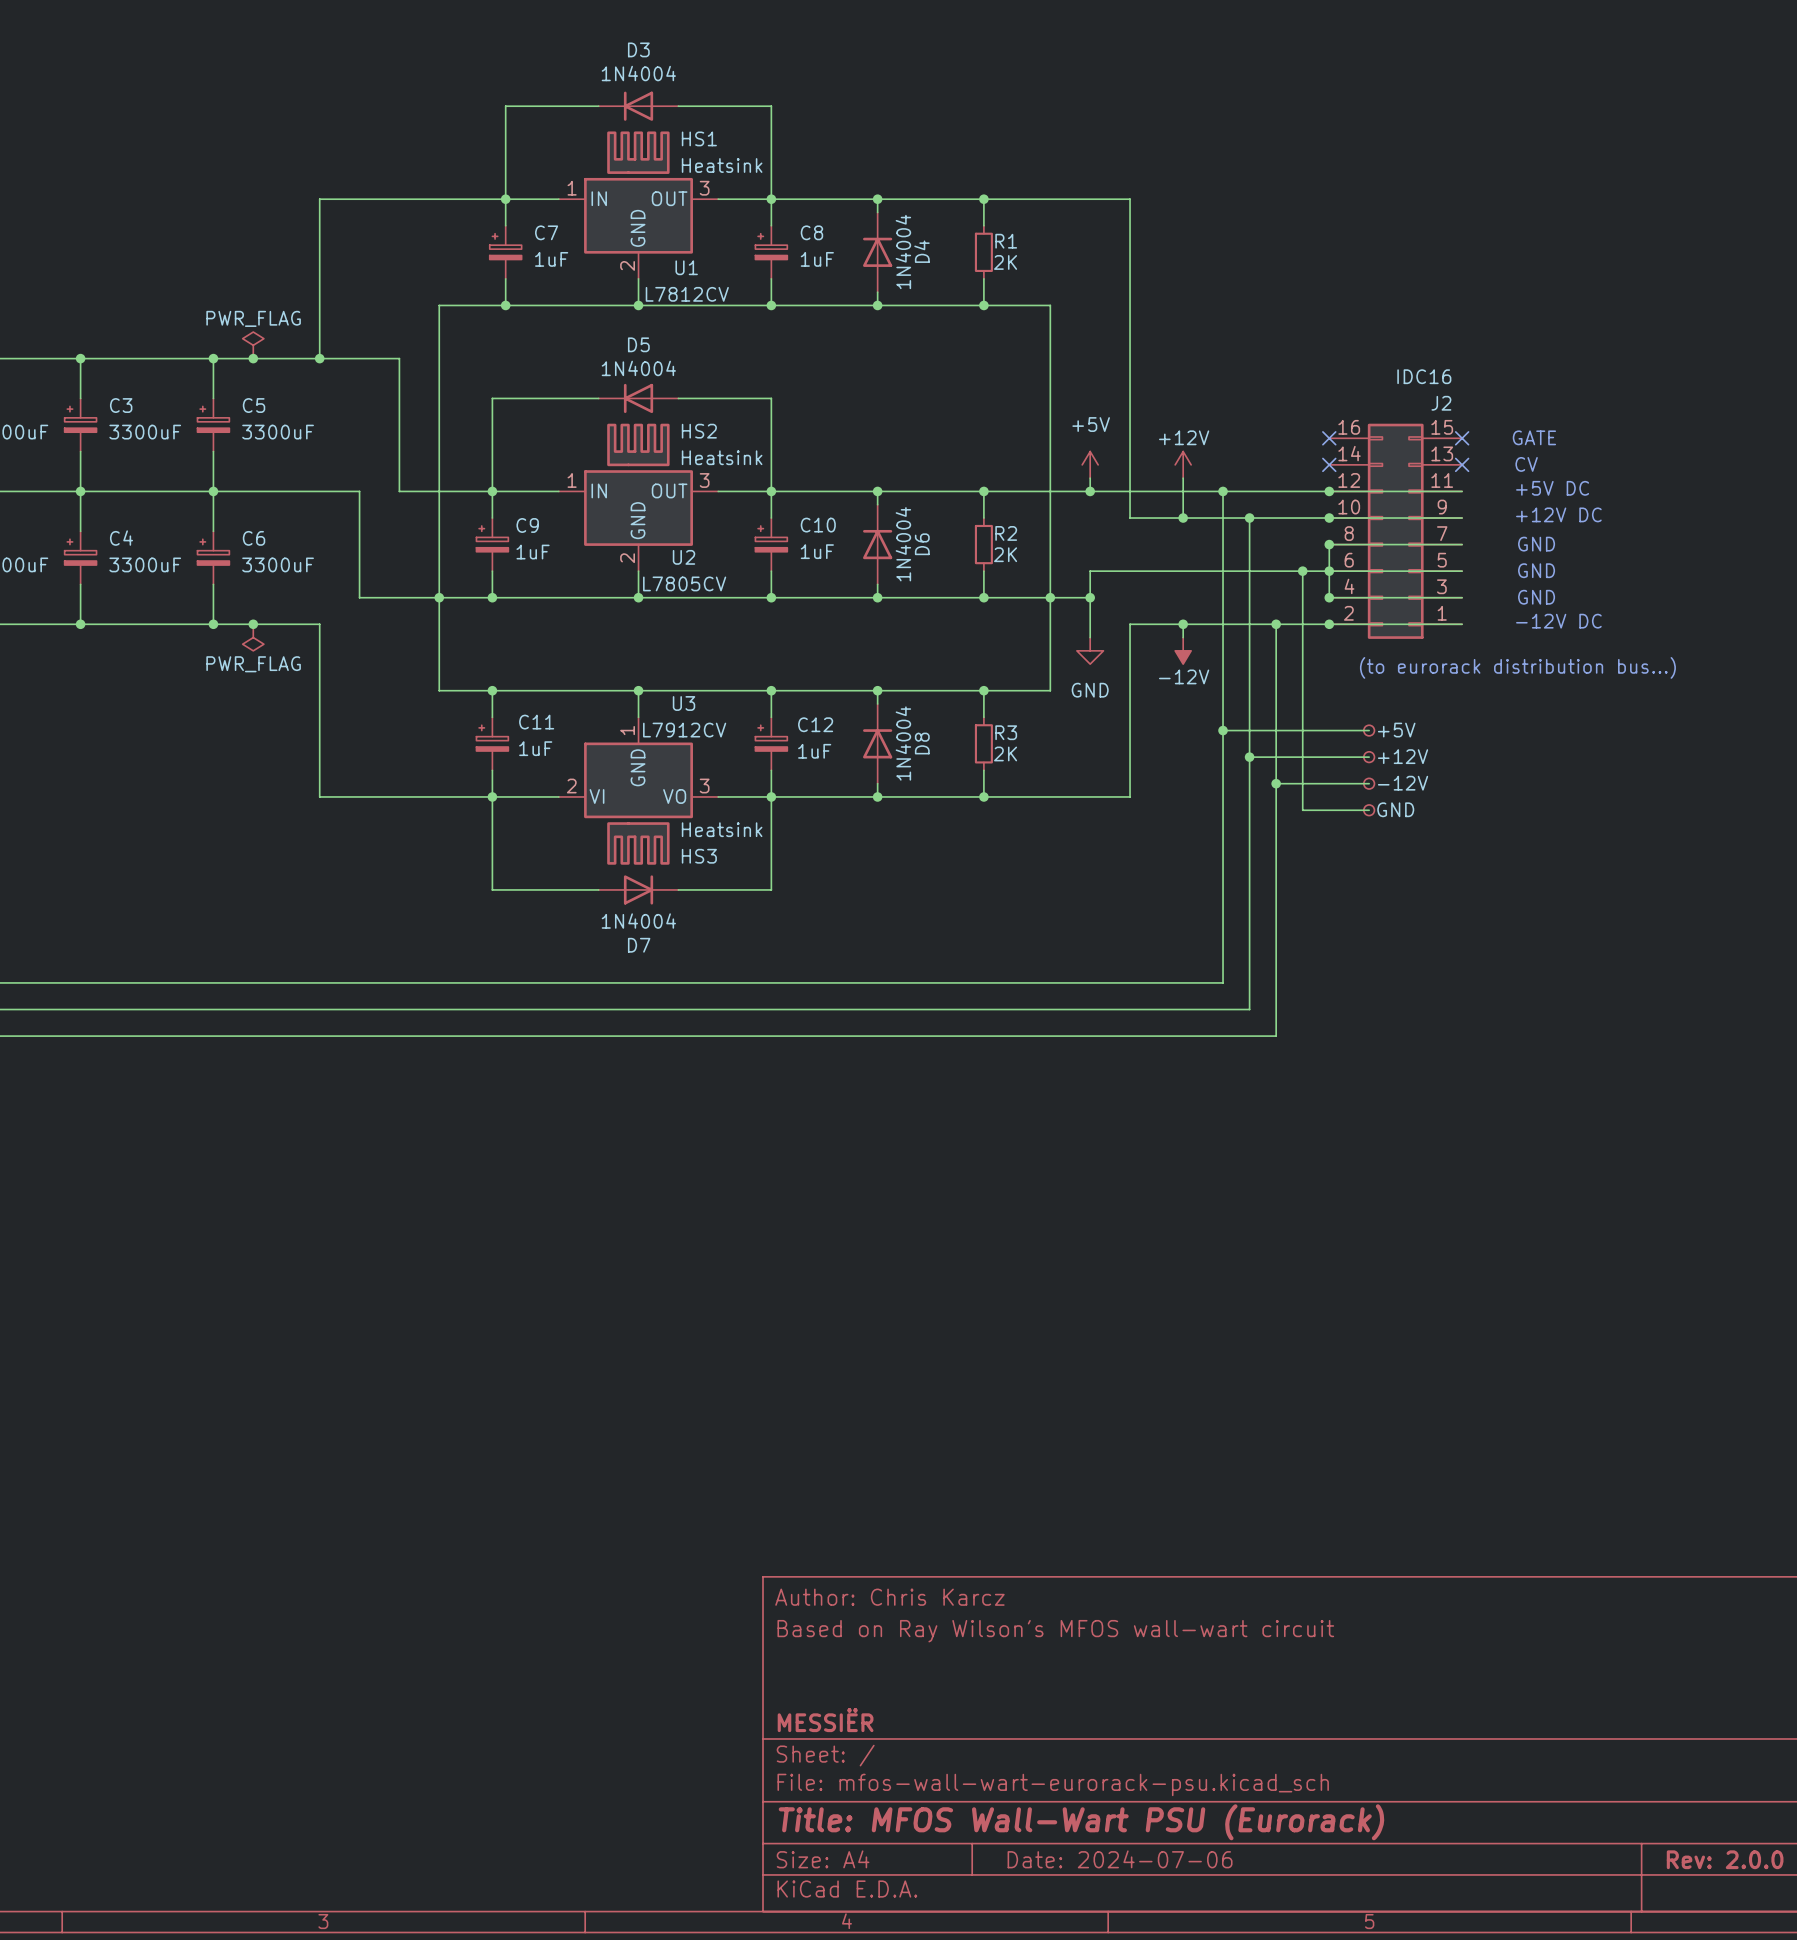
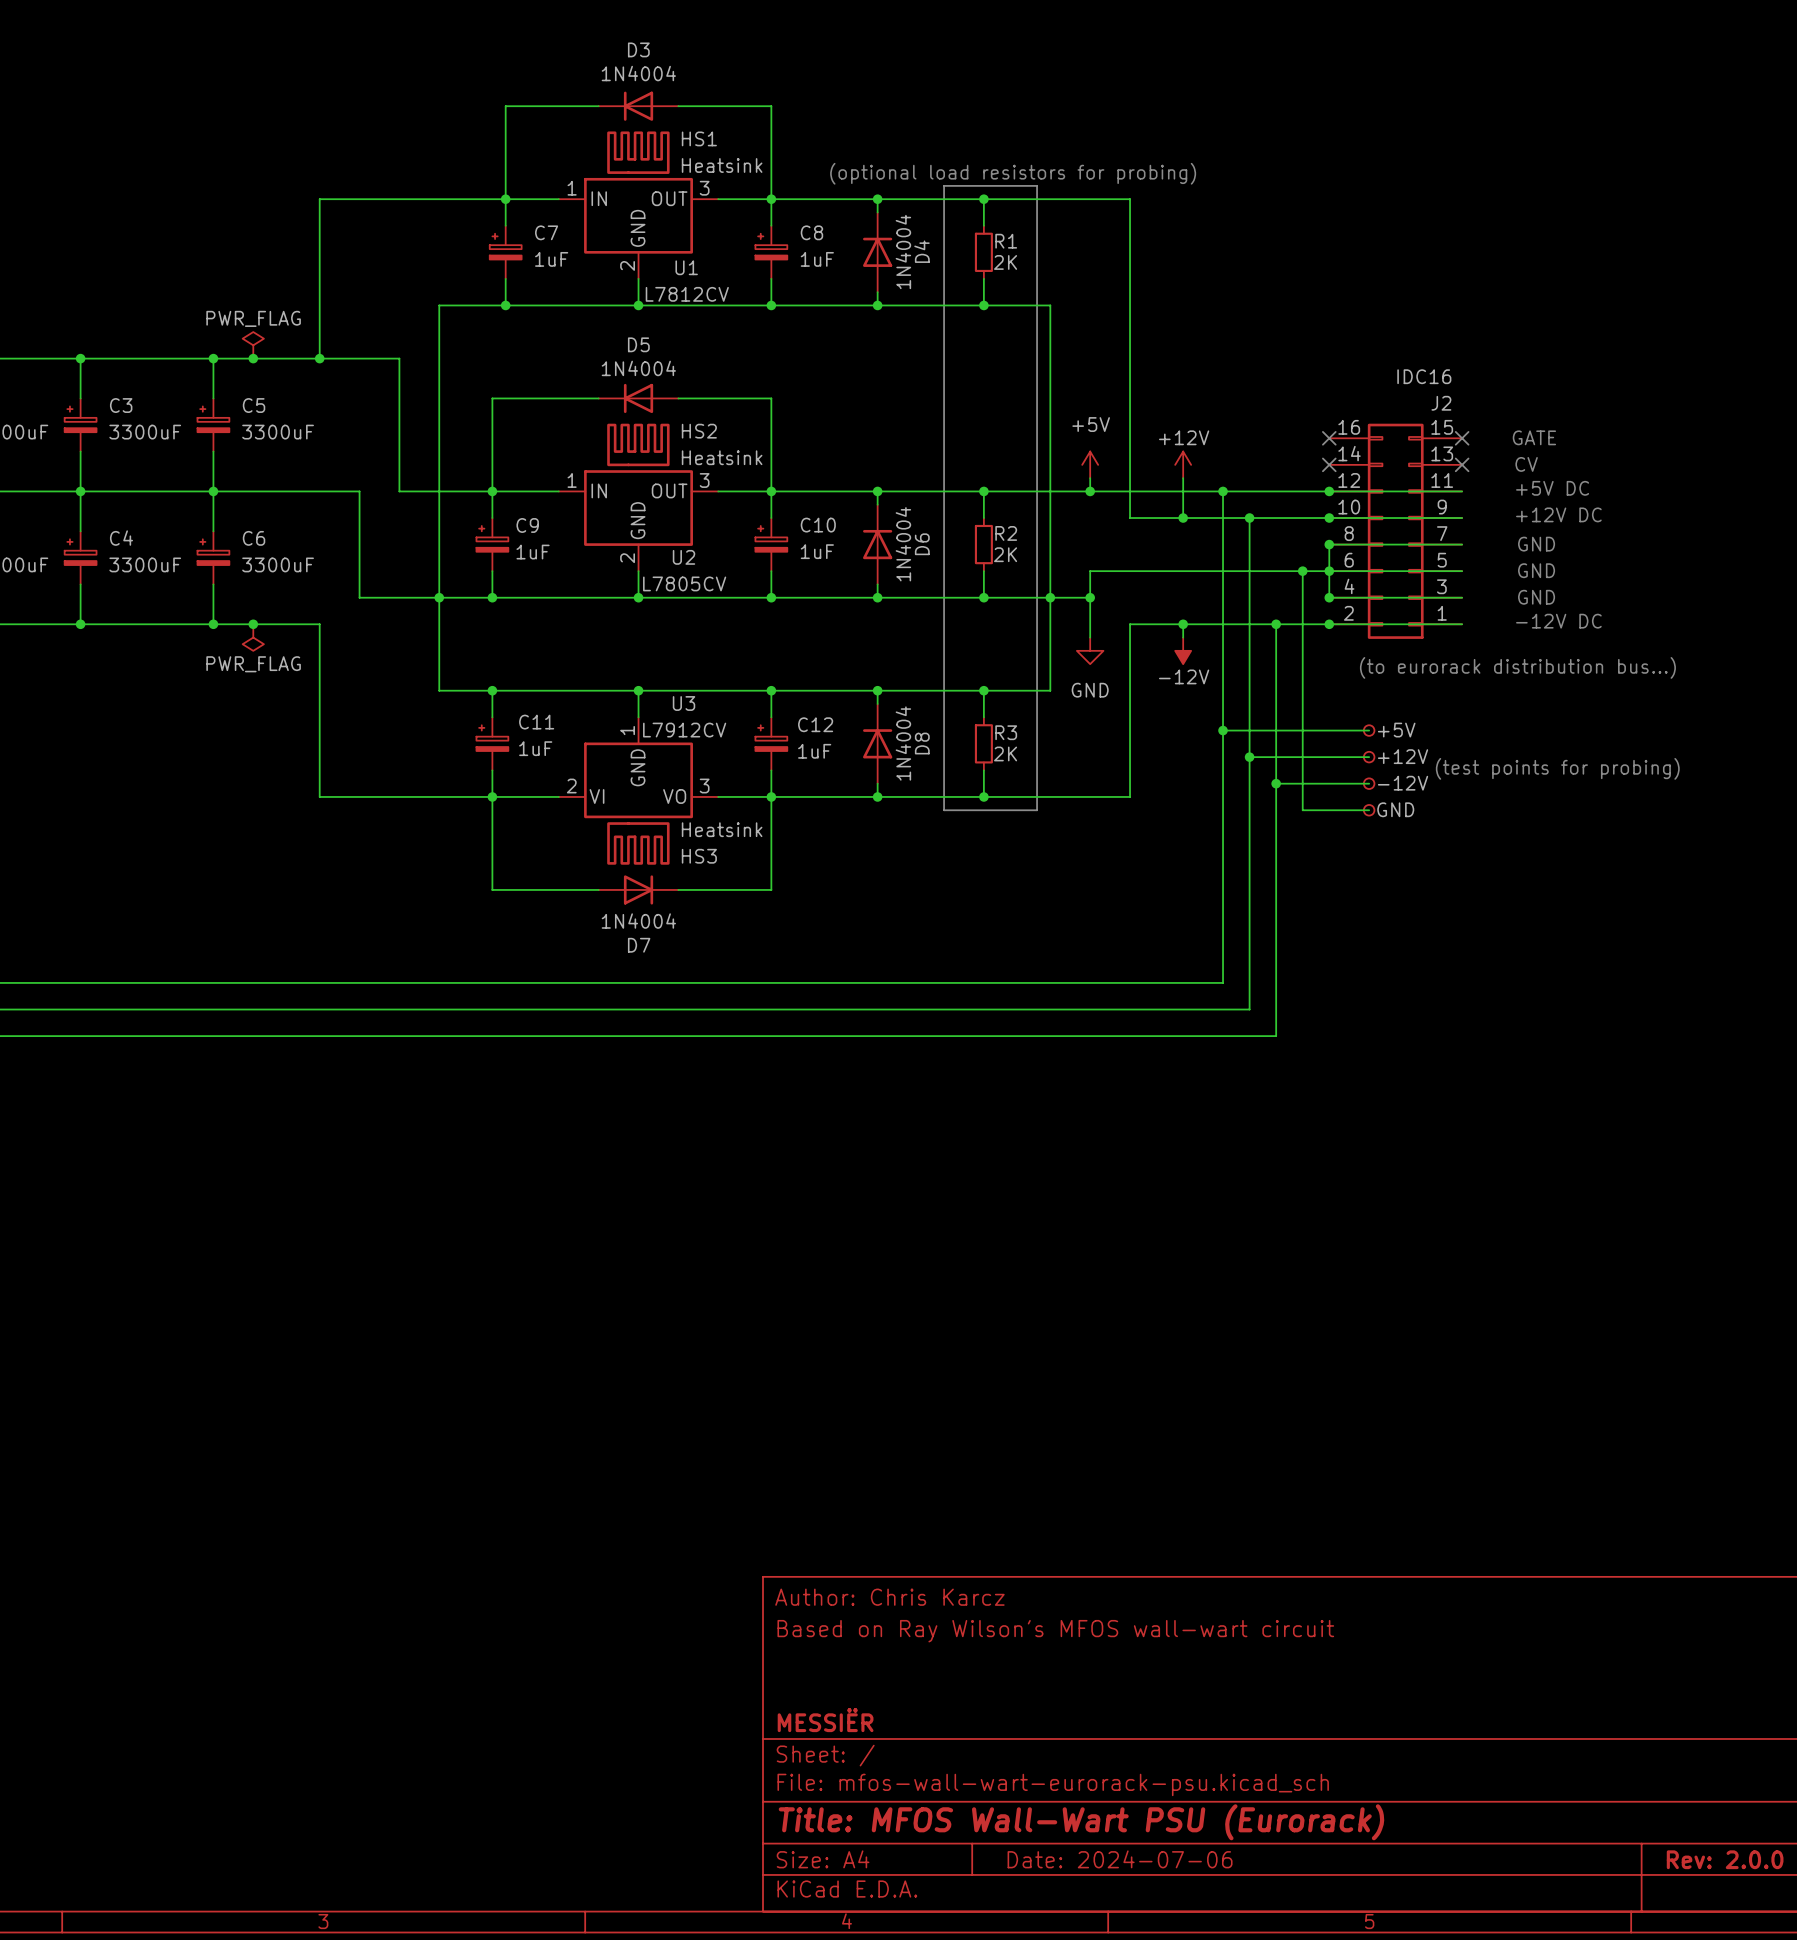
text: none -> (optional load resistors for probing) (1013, 173)
line: none -> (944, 185) (1037, 185) (1037, 810) (944, 810) (944, 185)
text: none -> (test points for probing) (1557, 768)

